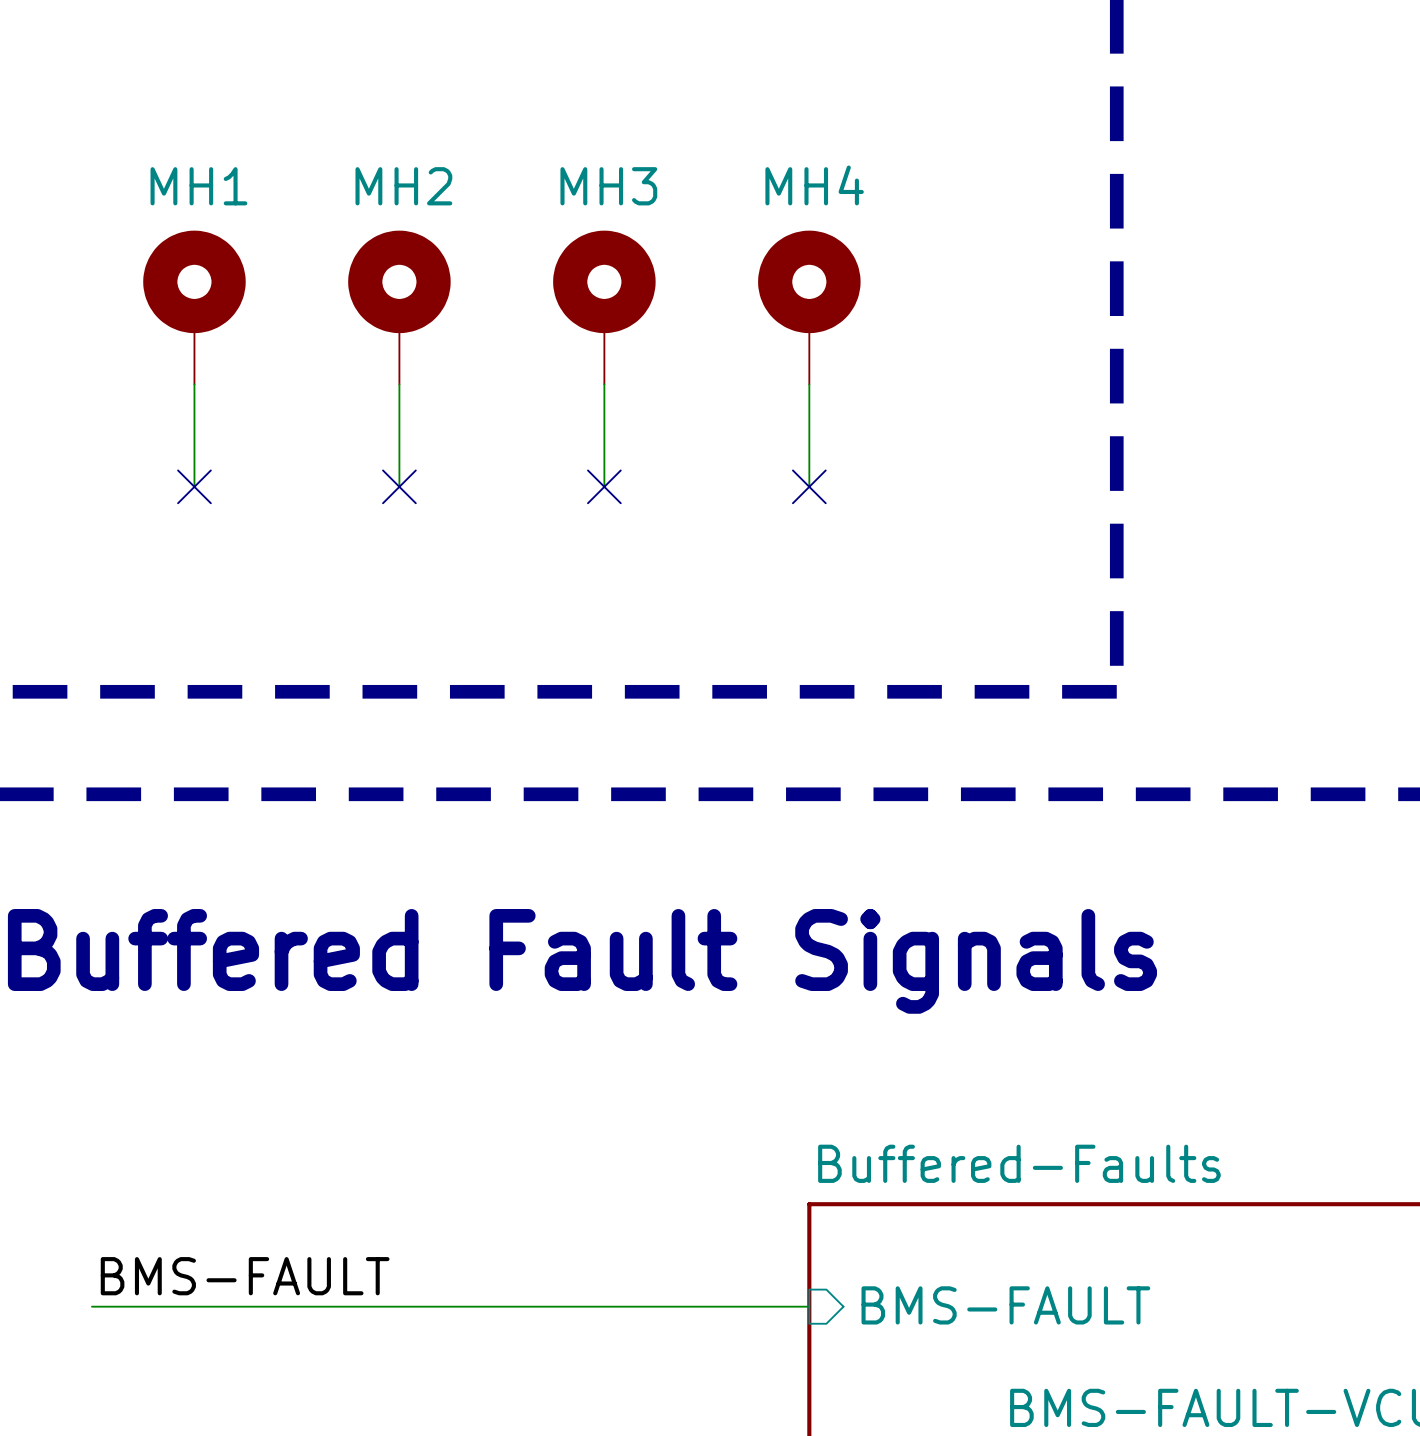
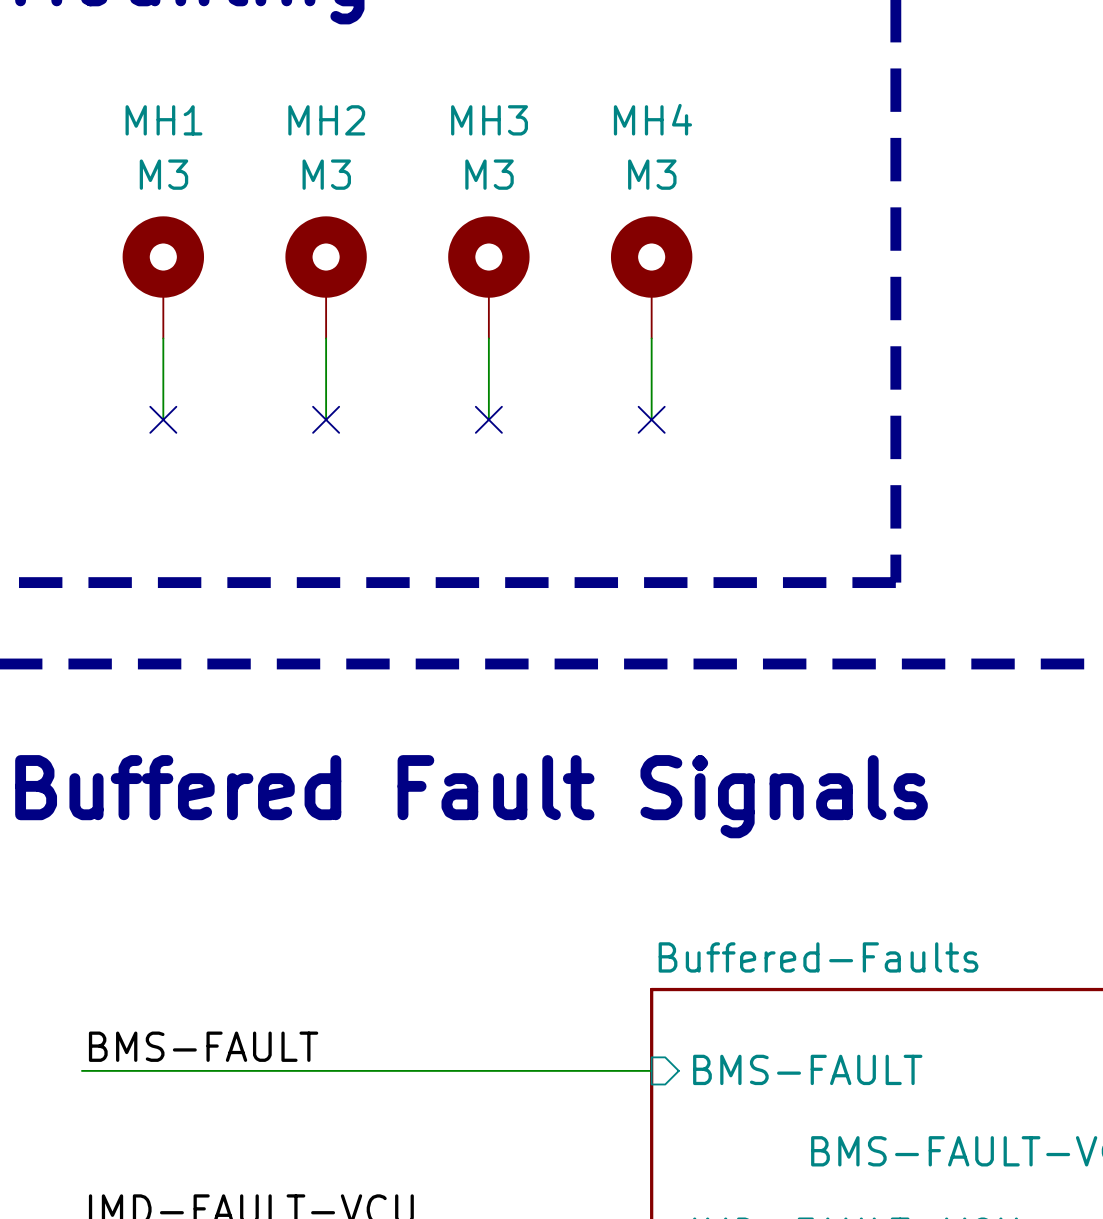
MH1 text: none -> M3 (163, 174)
MH2 text: none -> M3 (326, 174)
MH3 text: none -> M3 (489, 174)
MH4 text: none -> M3 (652, 174)
MH4 name position: MH4 (814, 185) -> MH4 (652, 119)
MH1 name position: MH1 (198, 186) -> MH1 (163, 120)
MH2 name position: MH2 (403, 186) -> MH2 (326, 120)
MH3 name position: MH3 (608, 186) -> MH3 (489, 120)

